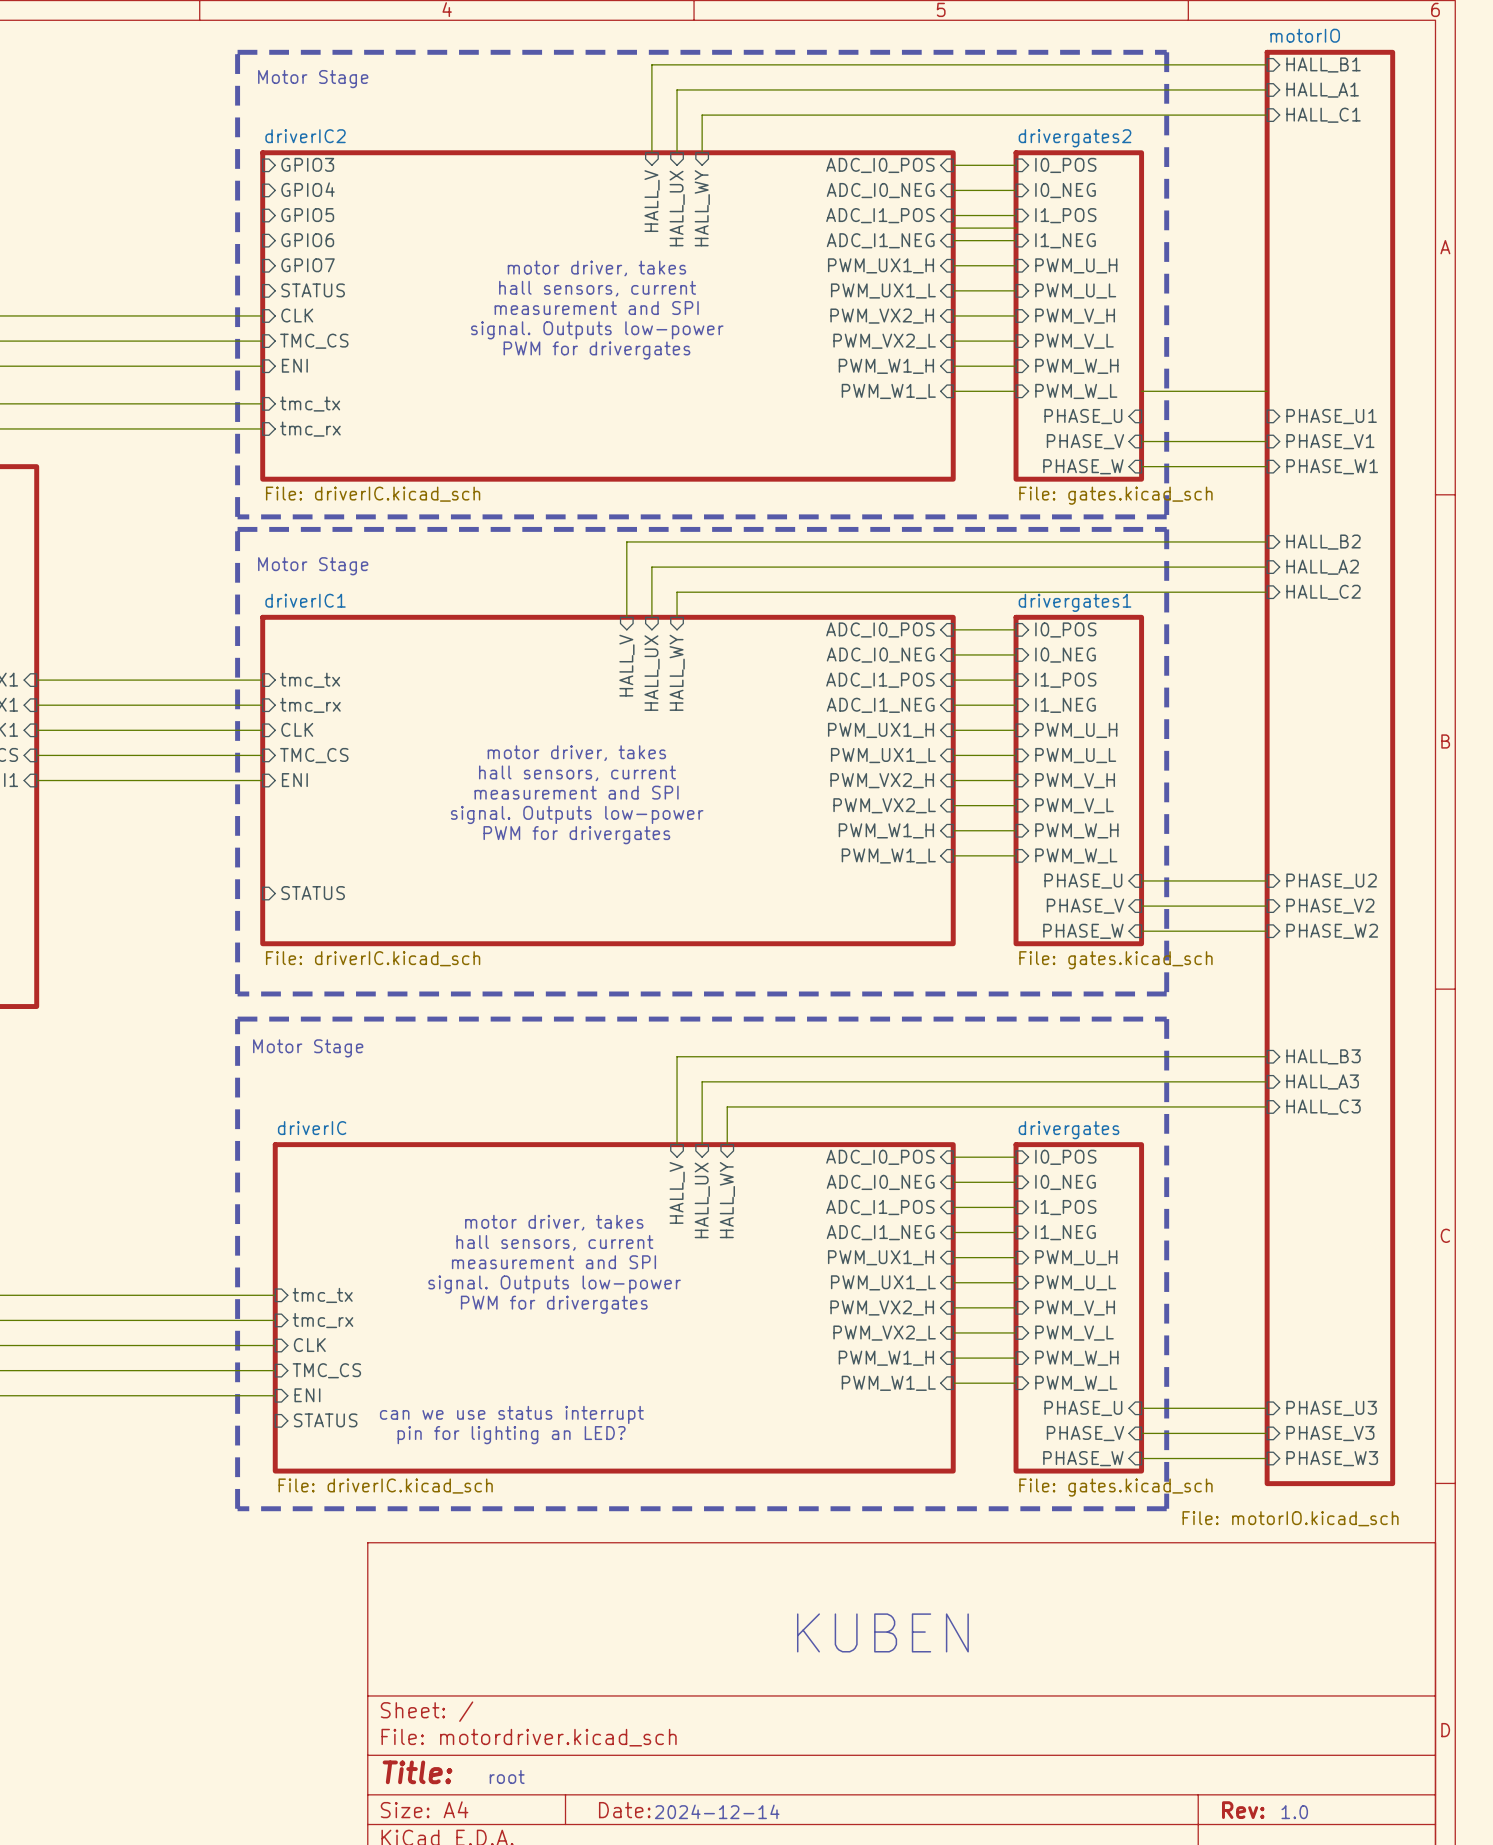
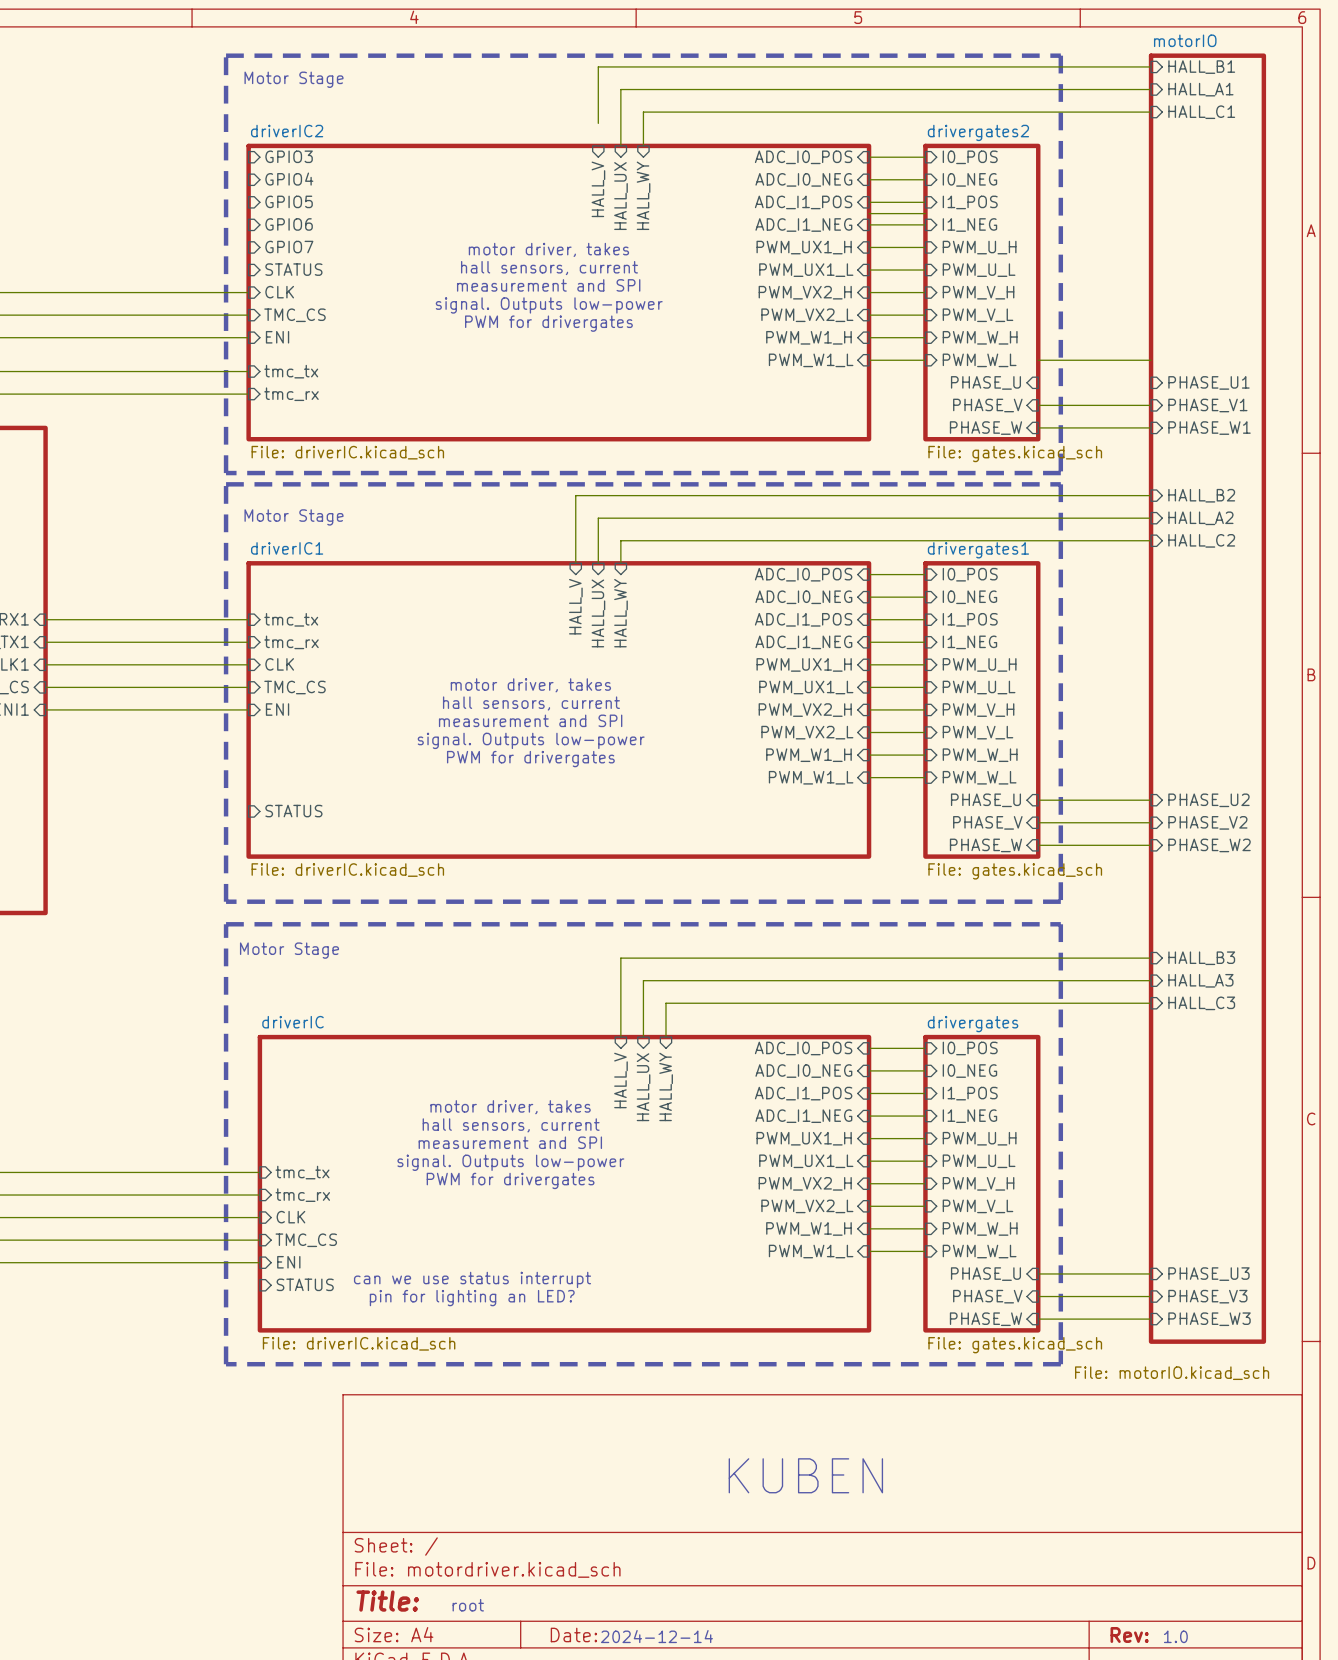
wire: (651, 127) (651, 152) -> none

